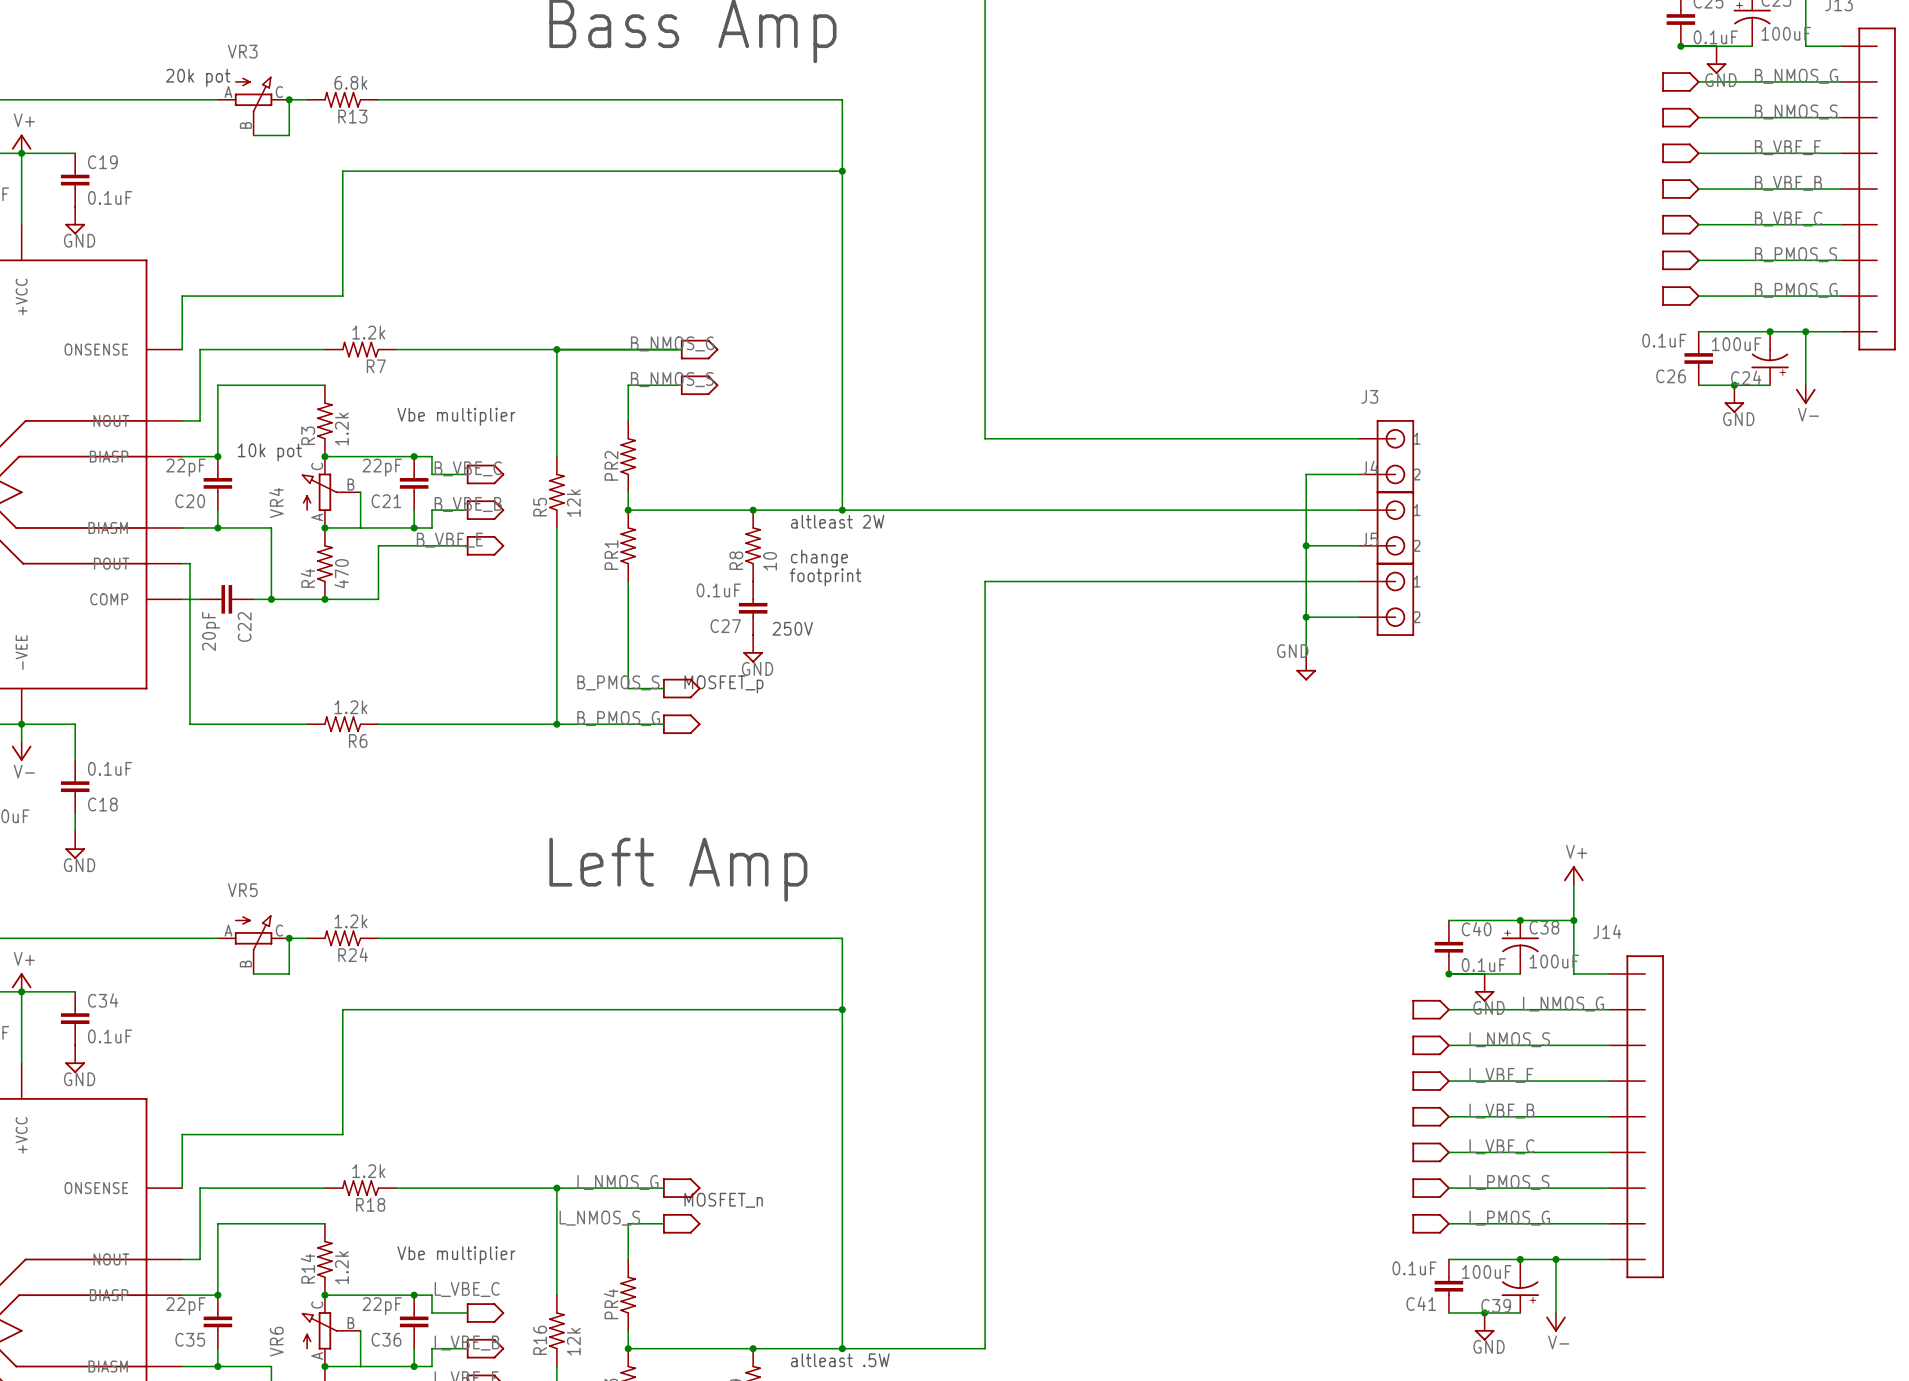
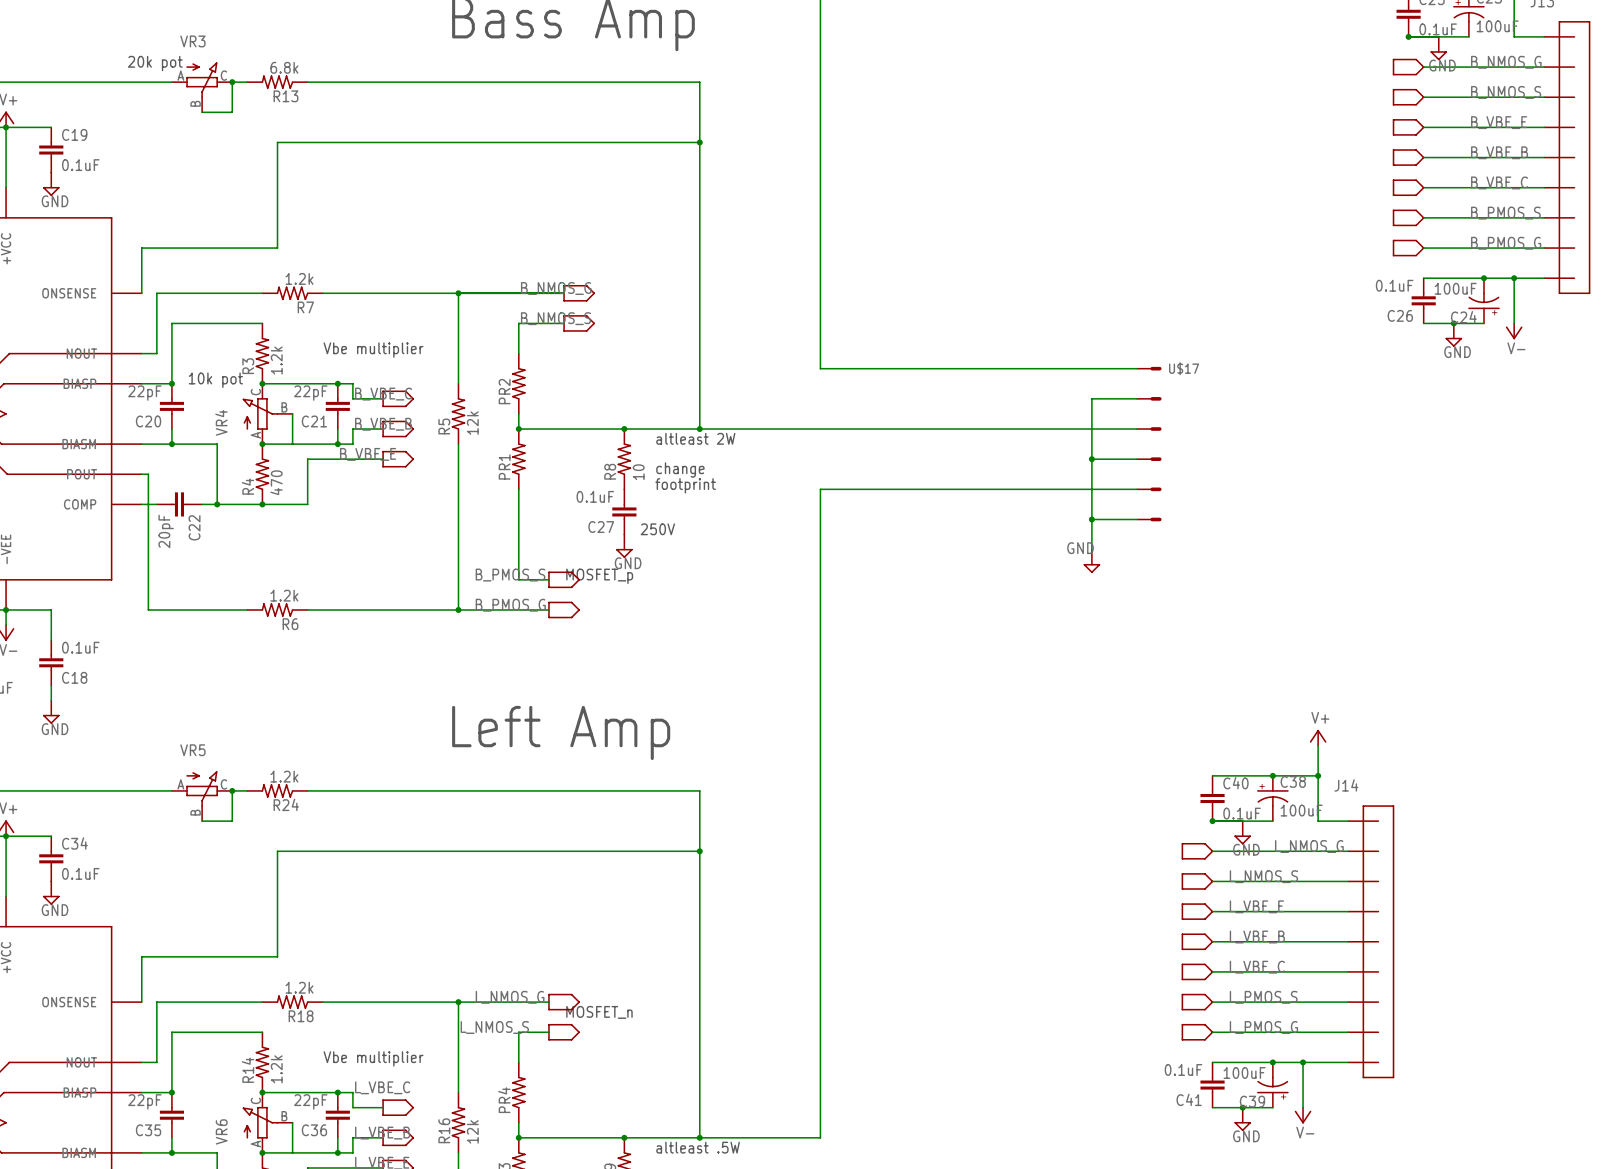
J3: (1386, 456) -> none
U$17: none -> (1149, 444)
J4: (1386, 527) -> none
J5: (1386, 599) -> none

